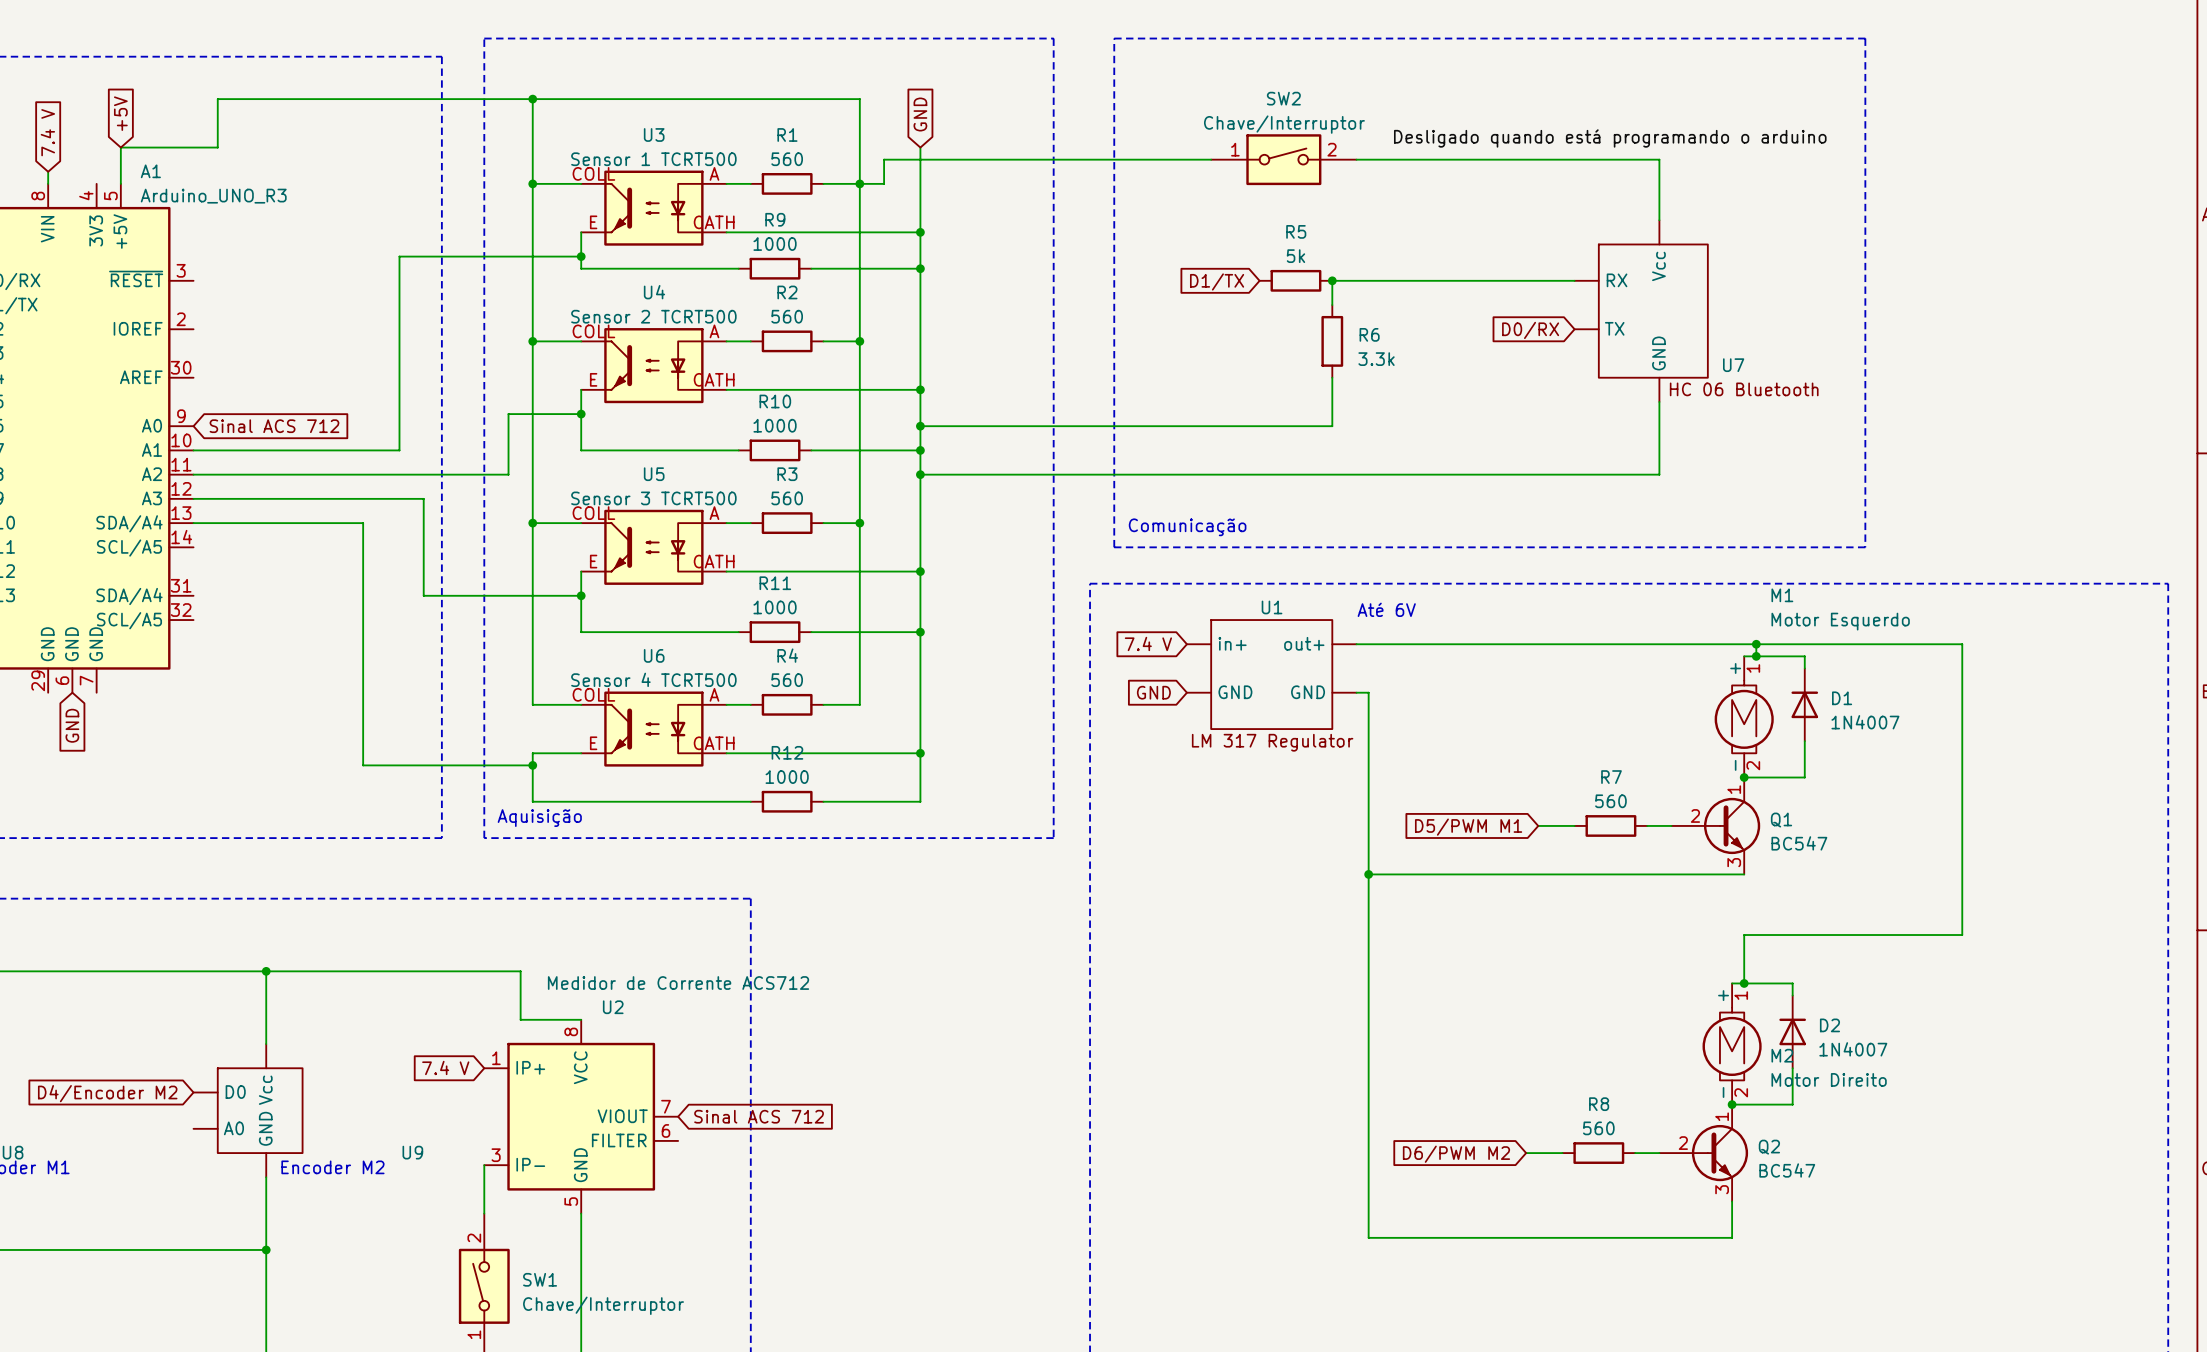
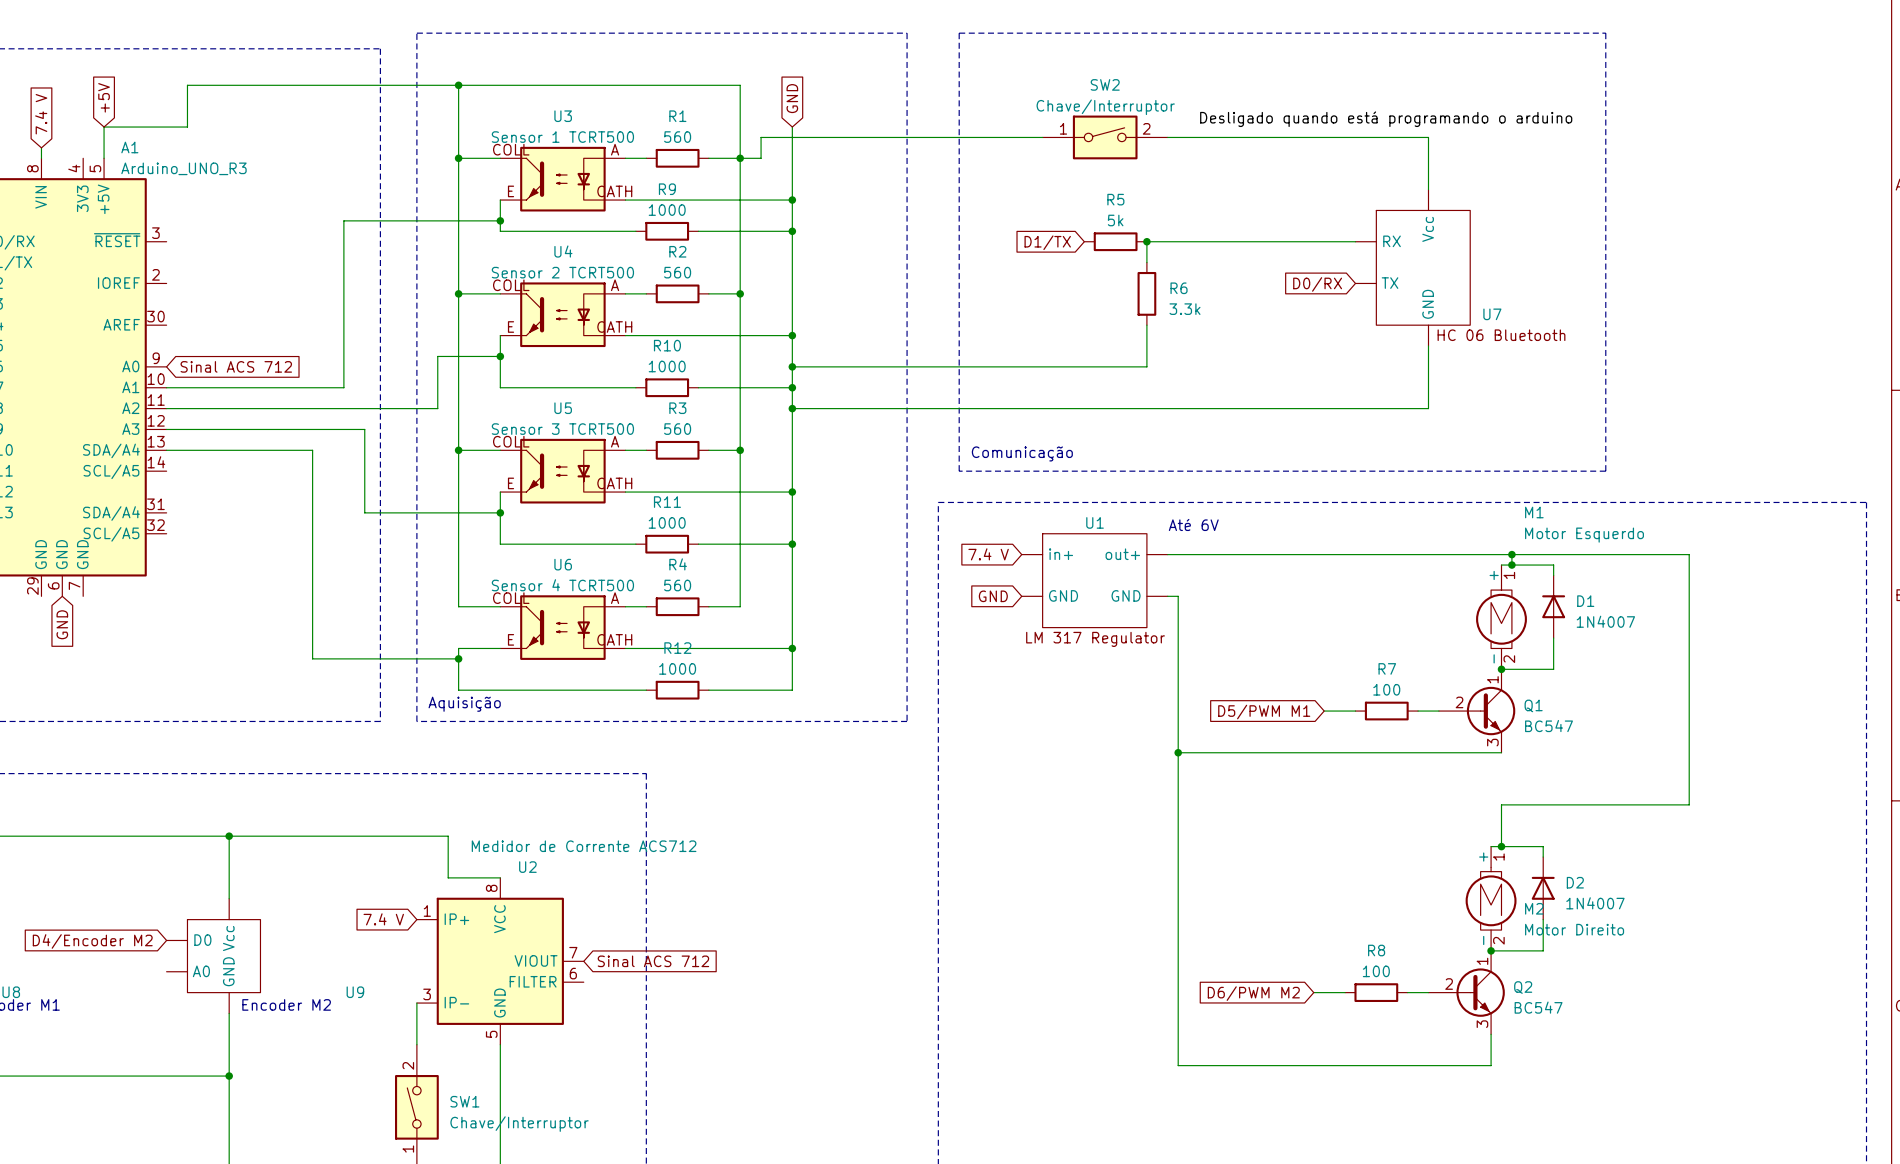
R7 value: 560 (1610, 801) -> 100 (1386, 689)
R8 value: 560 (1598, 1128) -> 100 (1376, 971)

